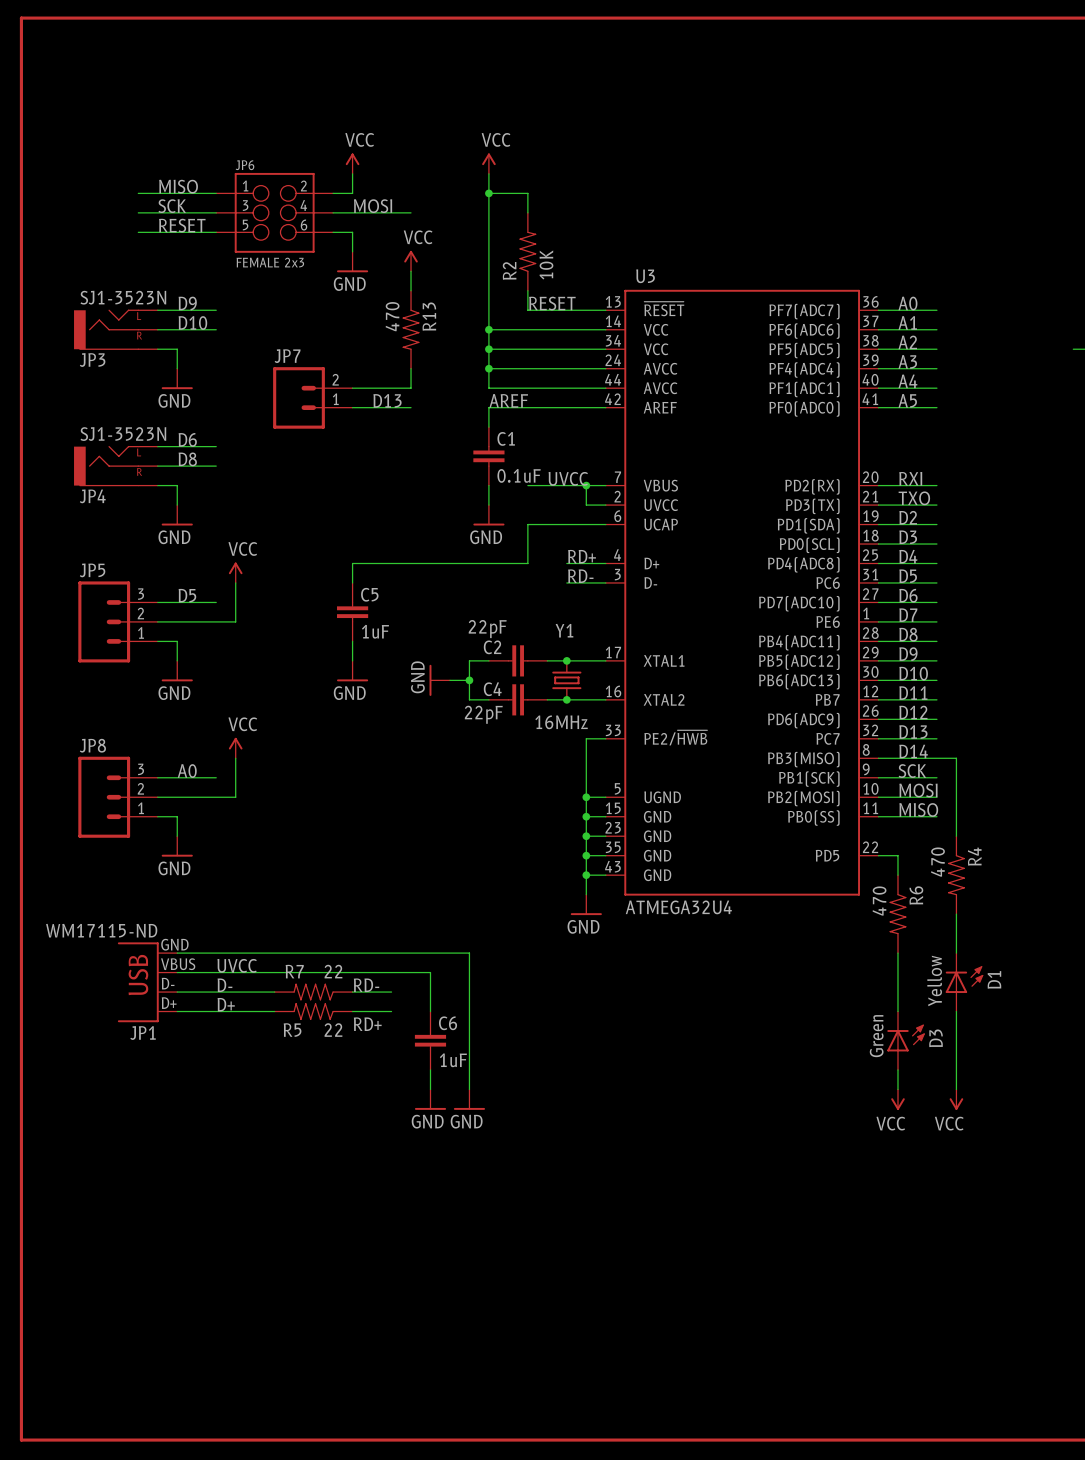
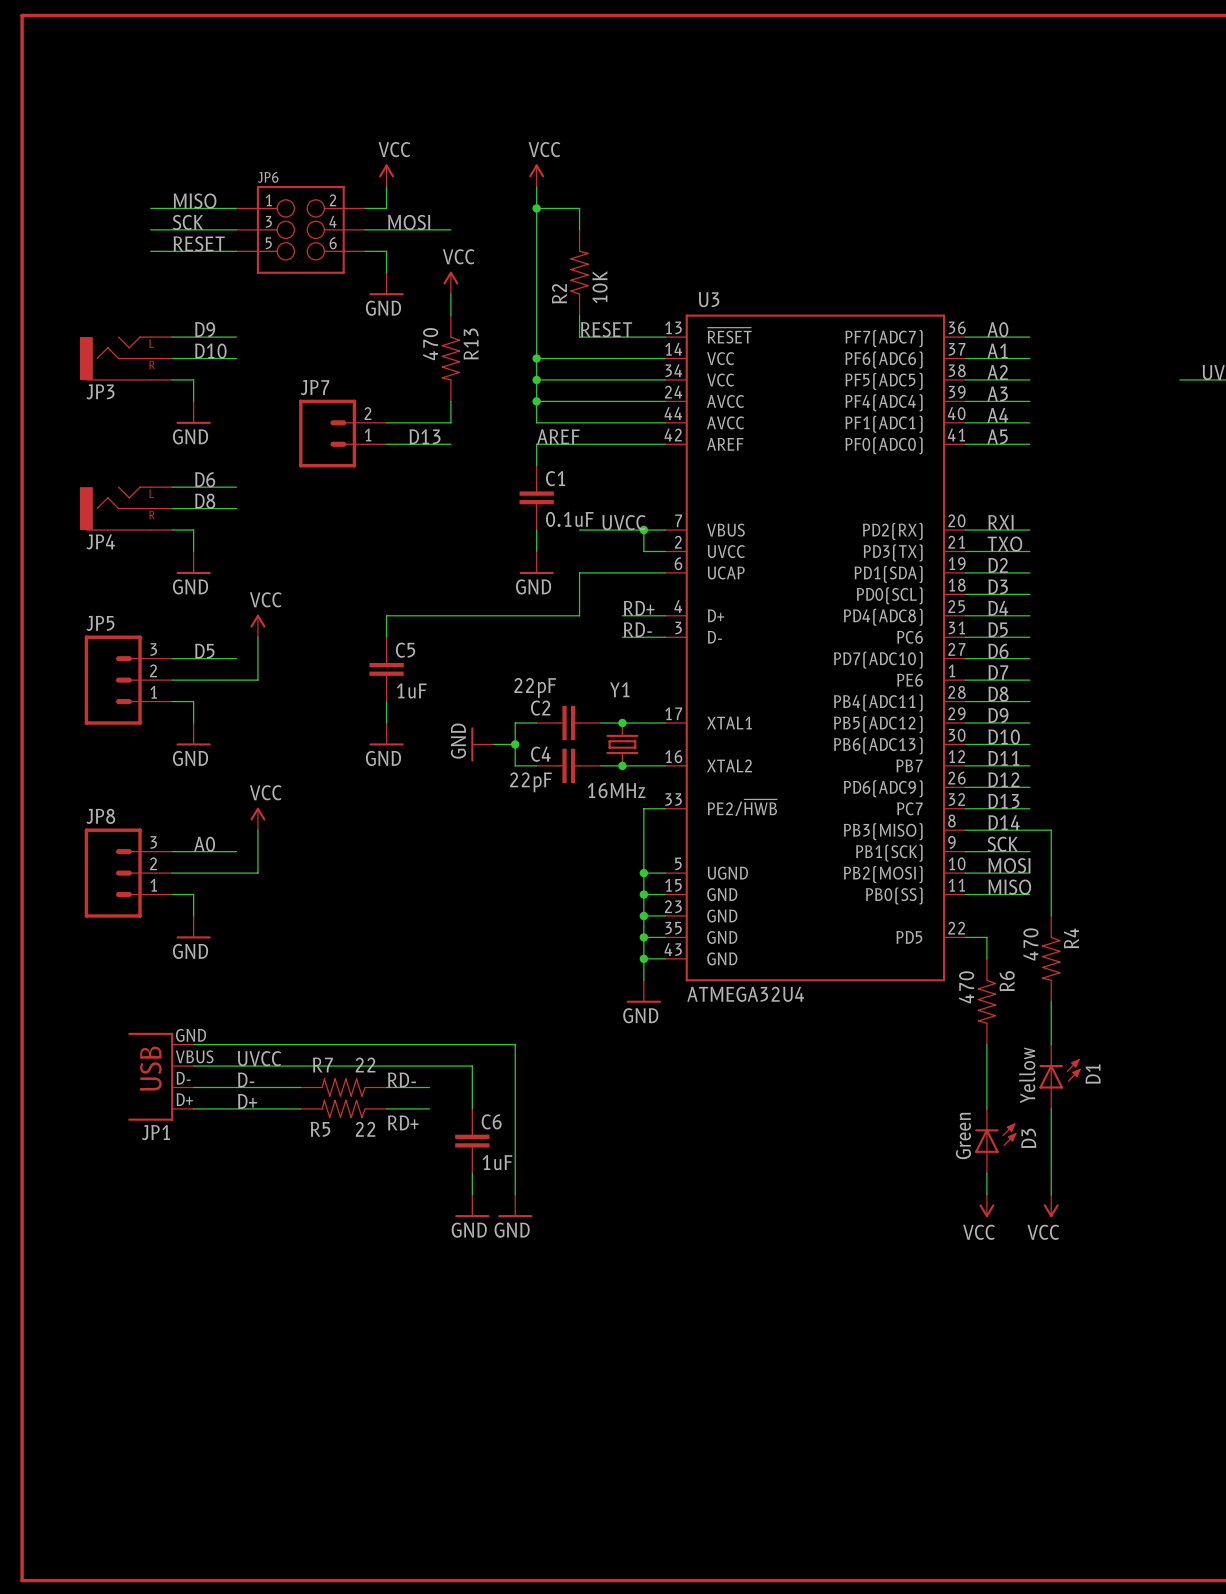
JP6 value: FEMALE 2x3 (270, 262) -> none
JP3 value: SJ1-3523N (123, 297) -> none
JP4 value: SJ1-3523N (123, 434) -> none
JP1 value: WM17115-ND (101, 930) -> none

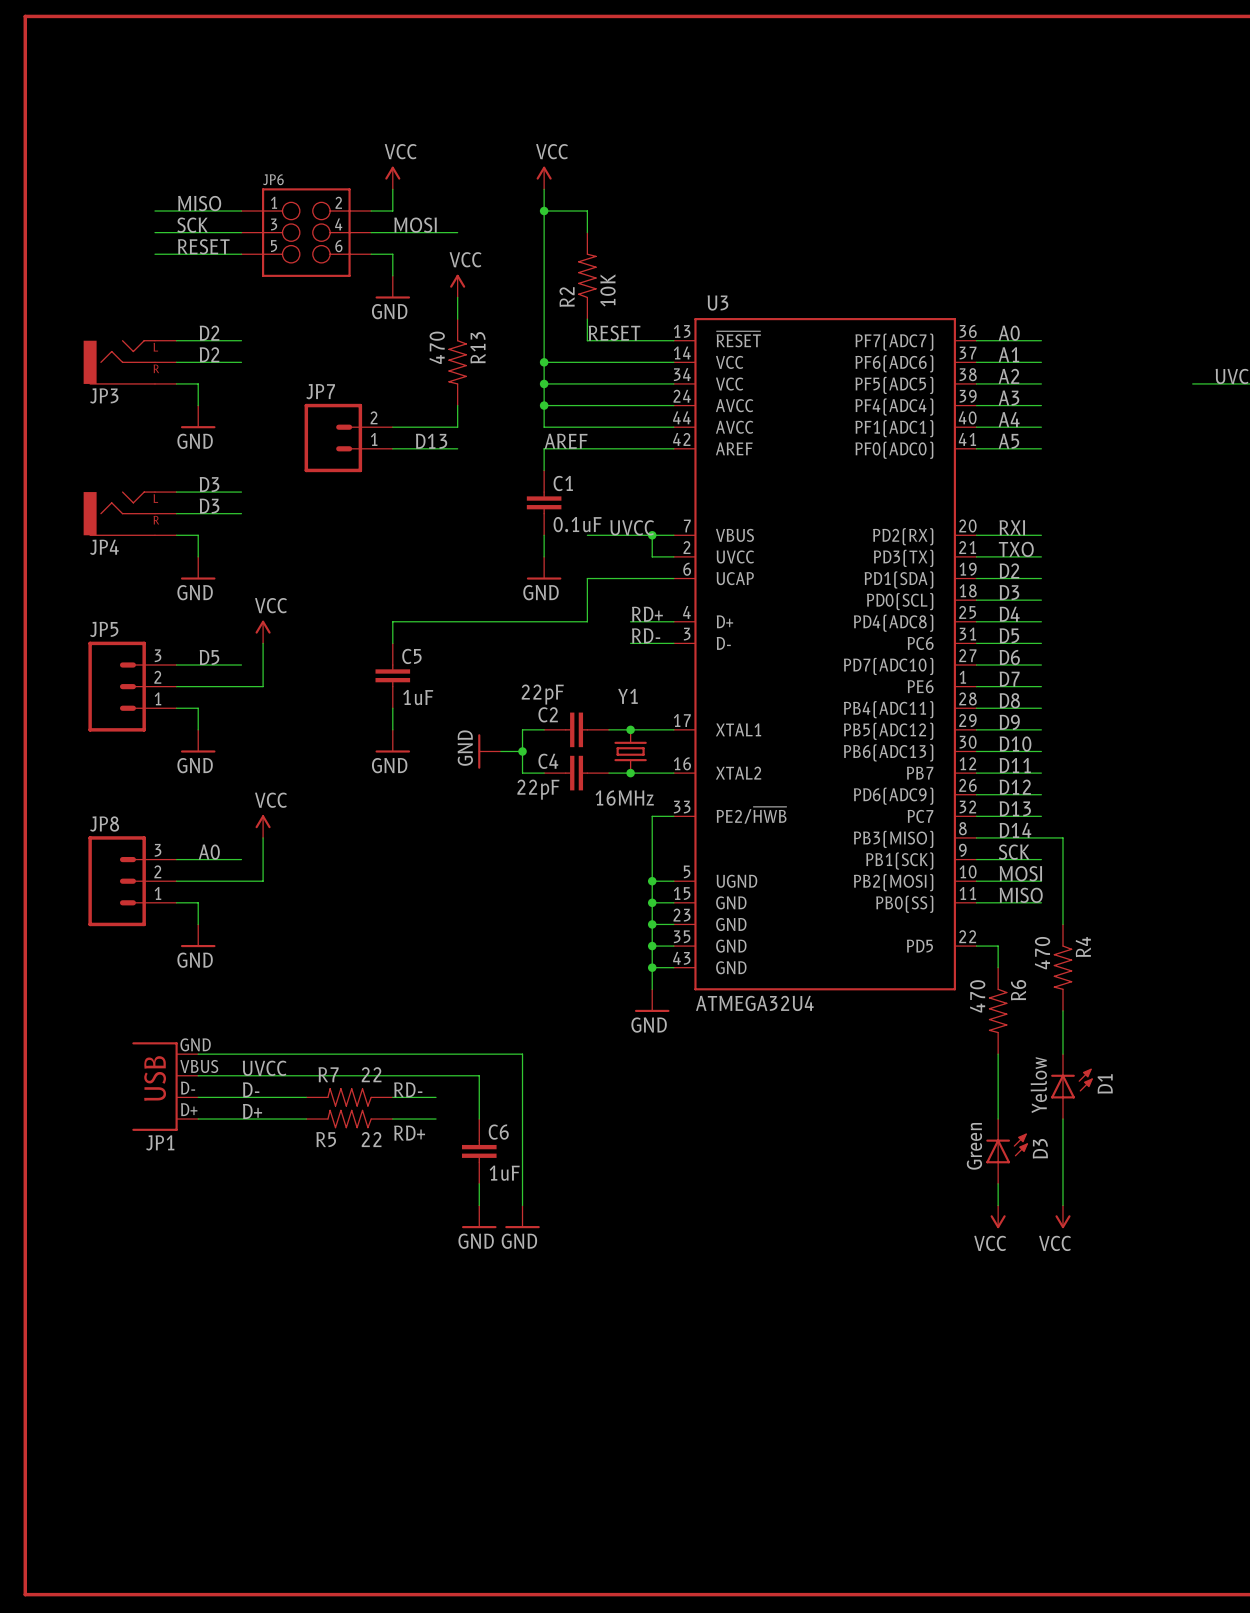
label: D9 (205, 329) -> D2 (209, 333)
label: D10 (210, 351) -> D2 (209, 354)
label: D6 (205, 479) -> D3 (209, 484)
label: D8 (205, 501) -> D3 (209, 506)

